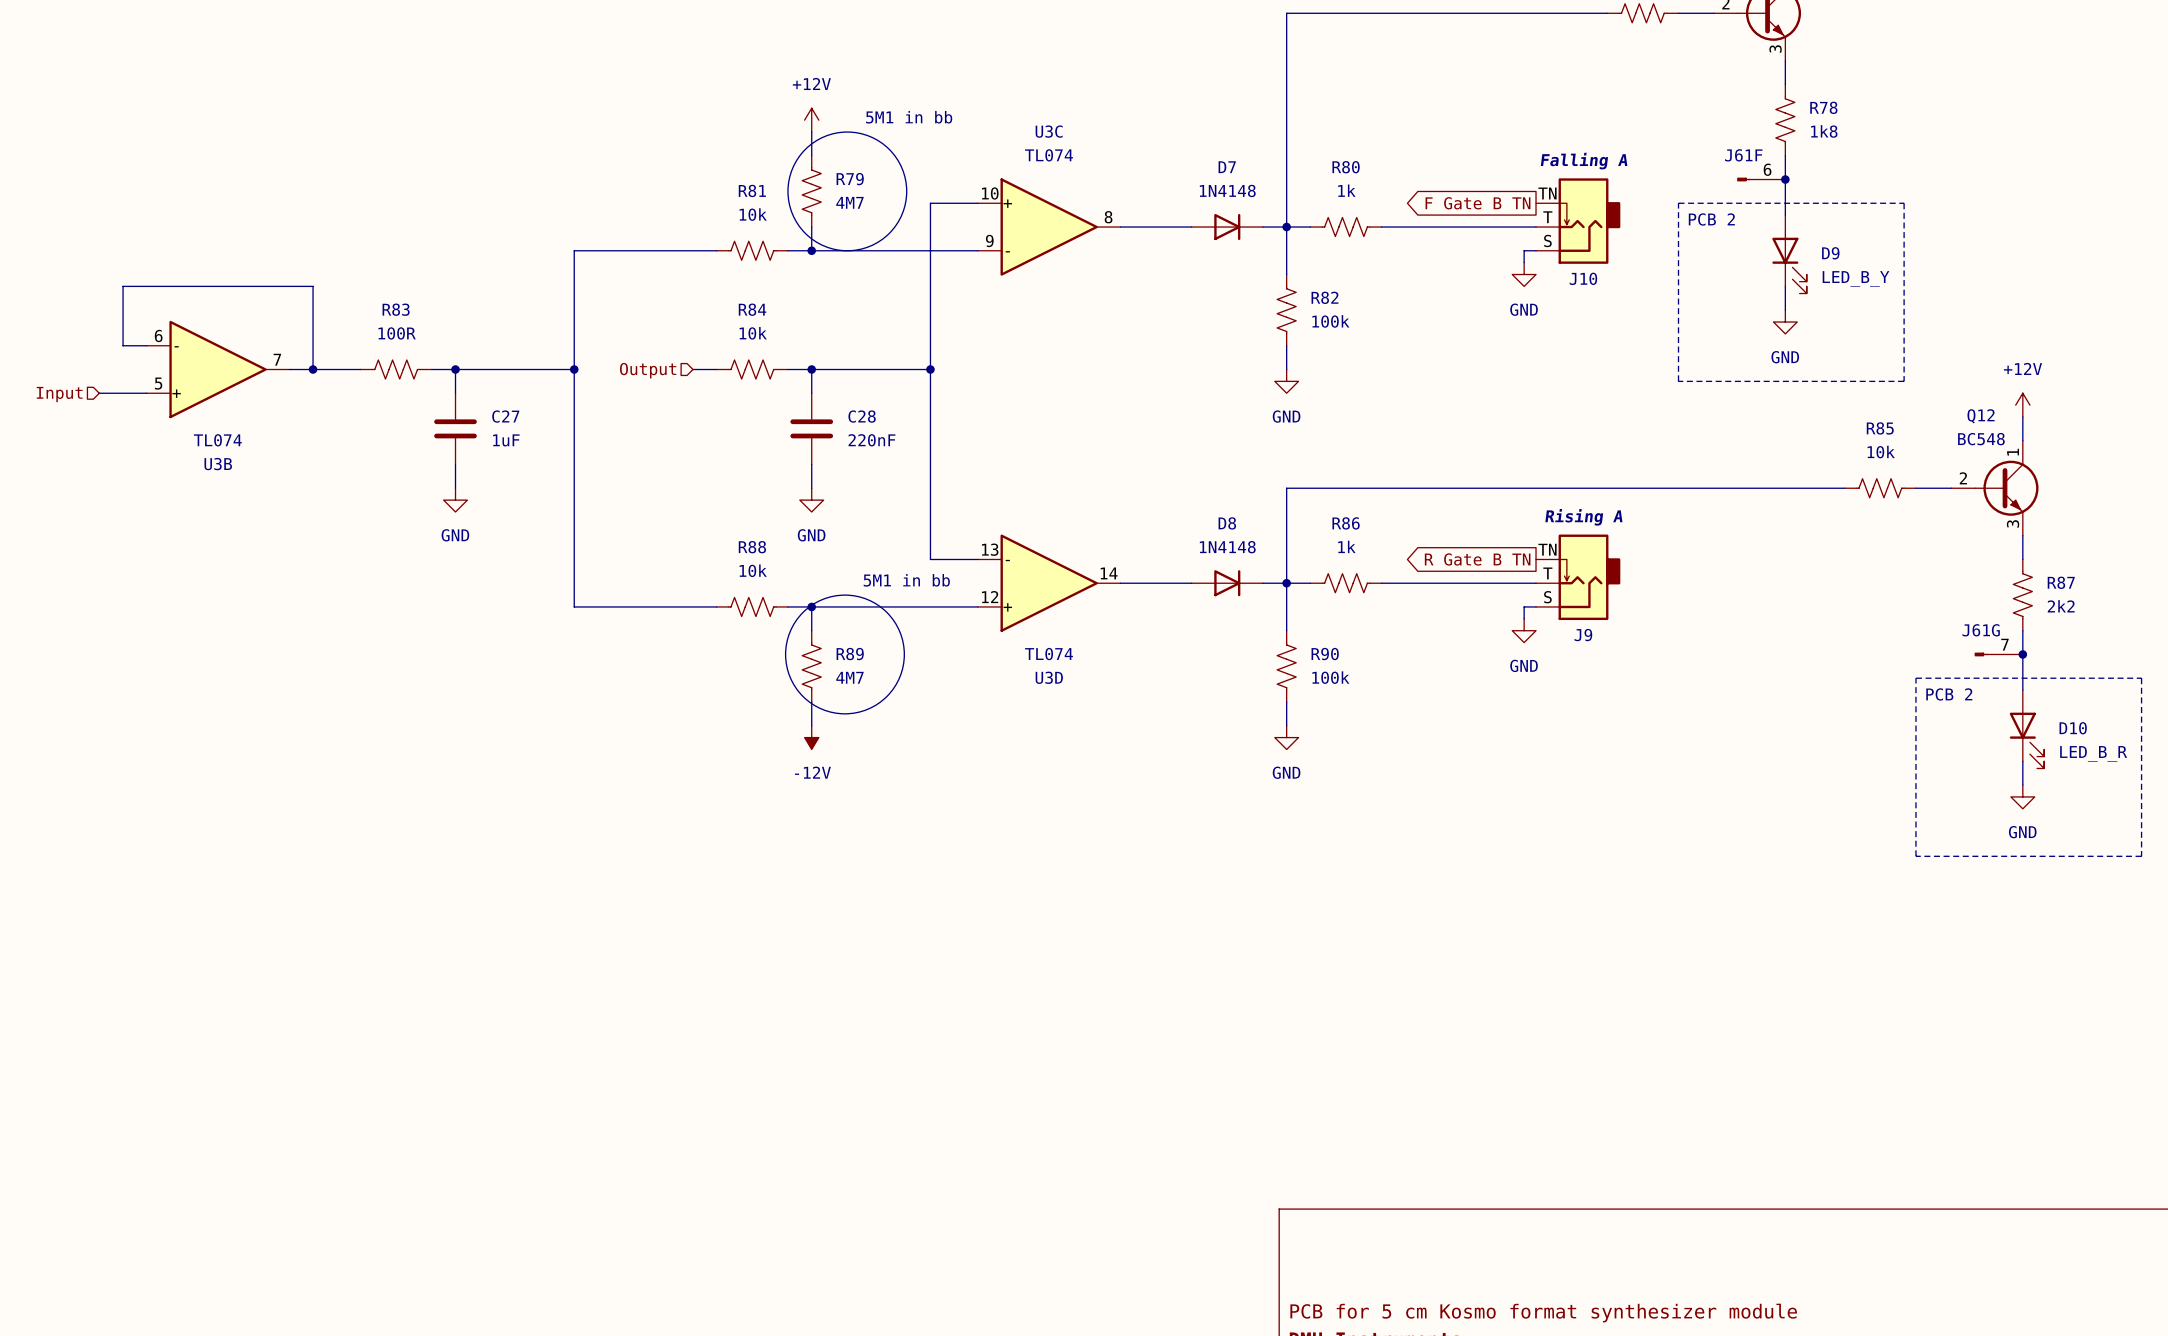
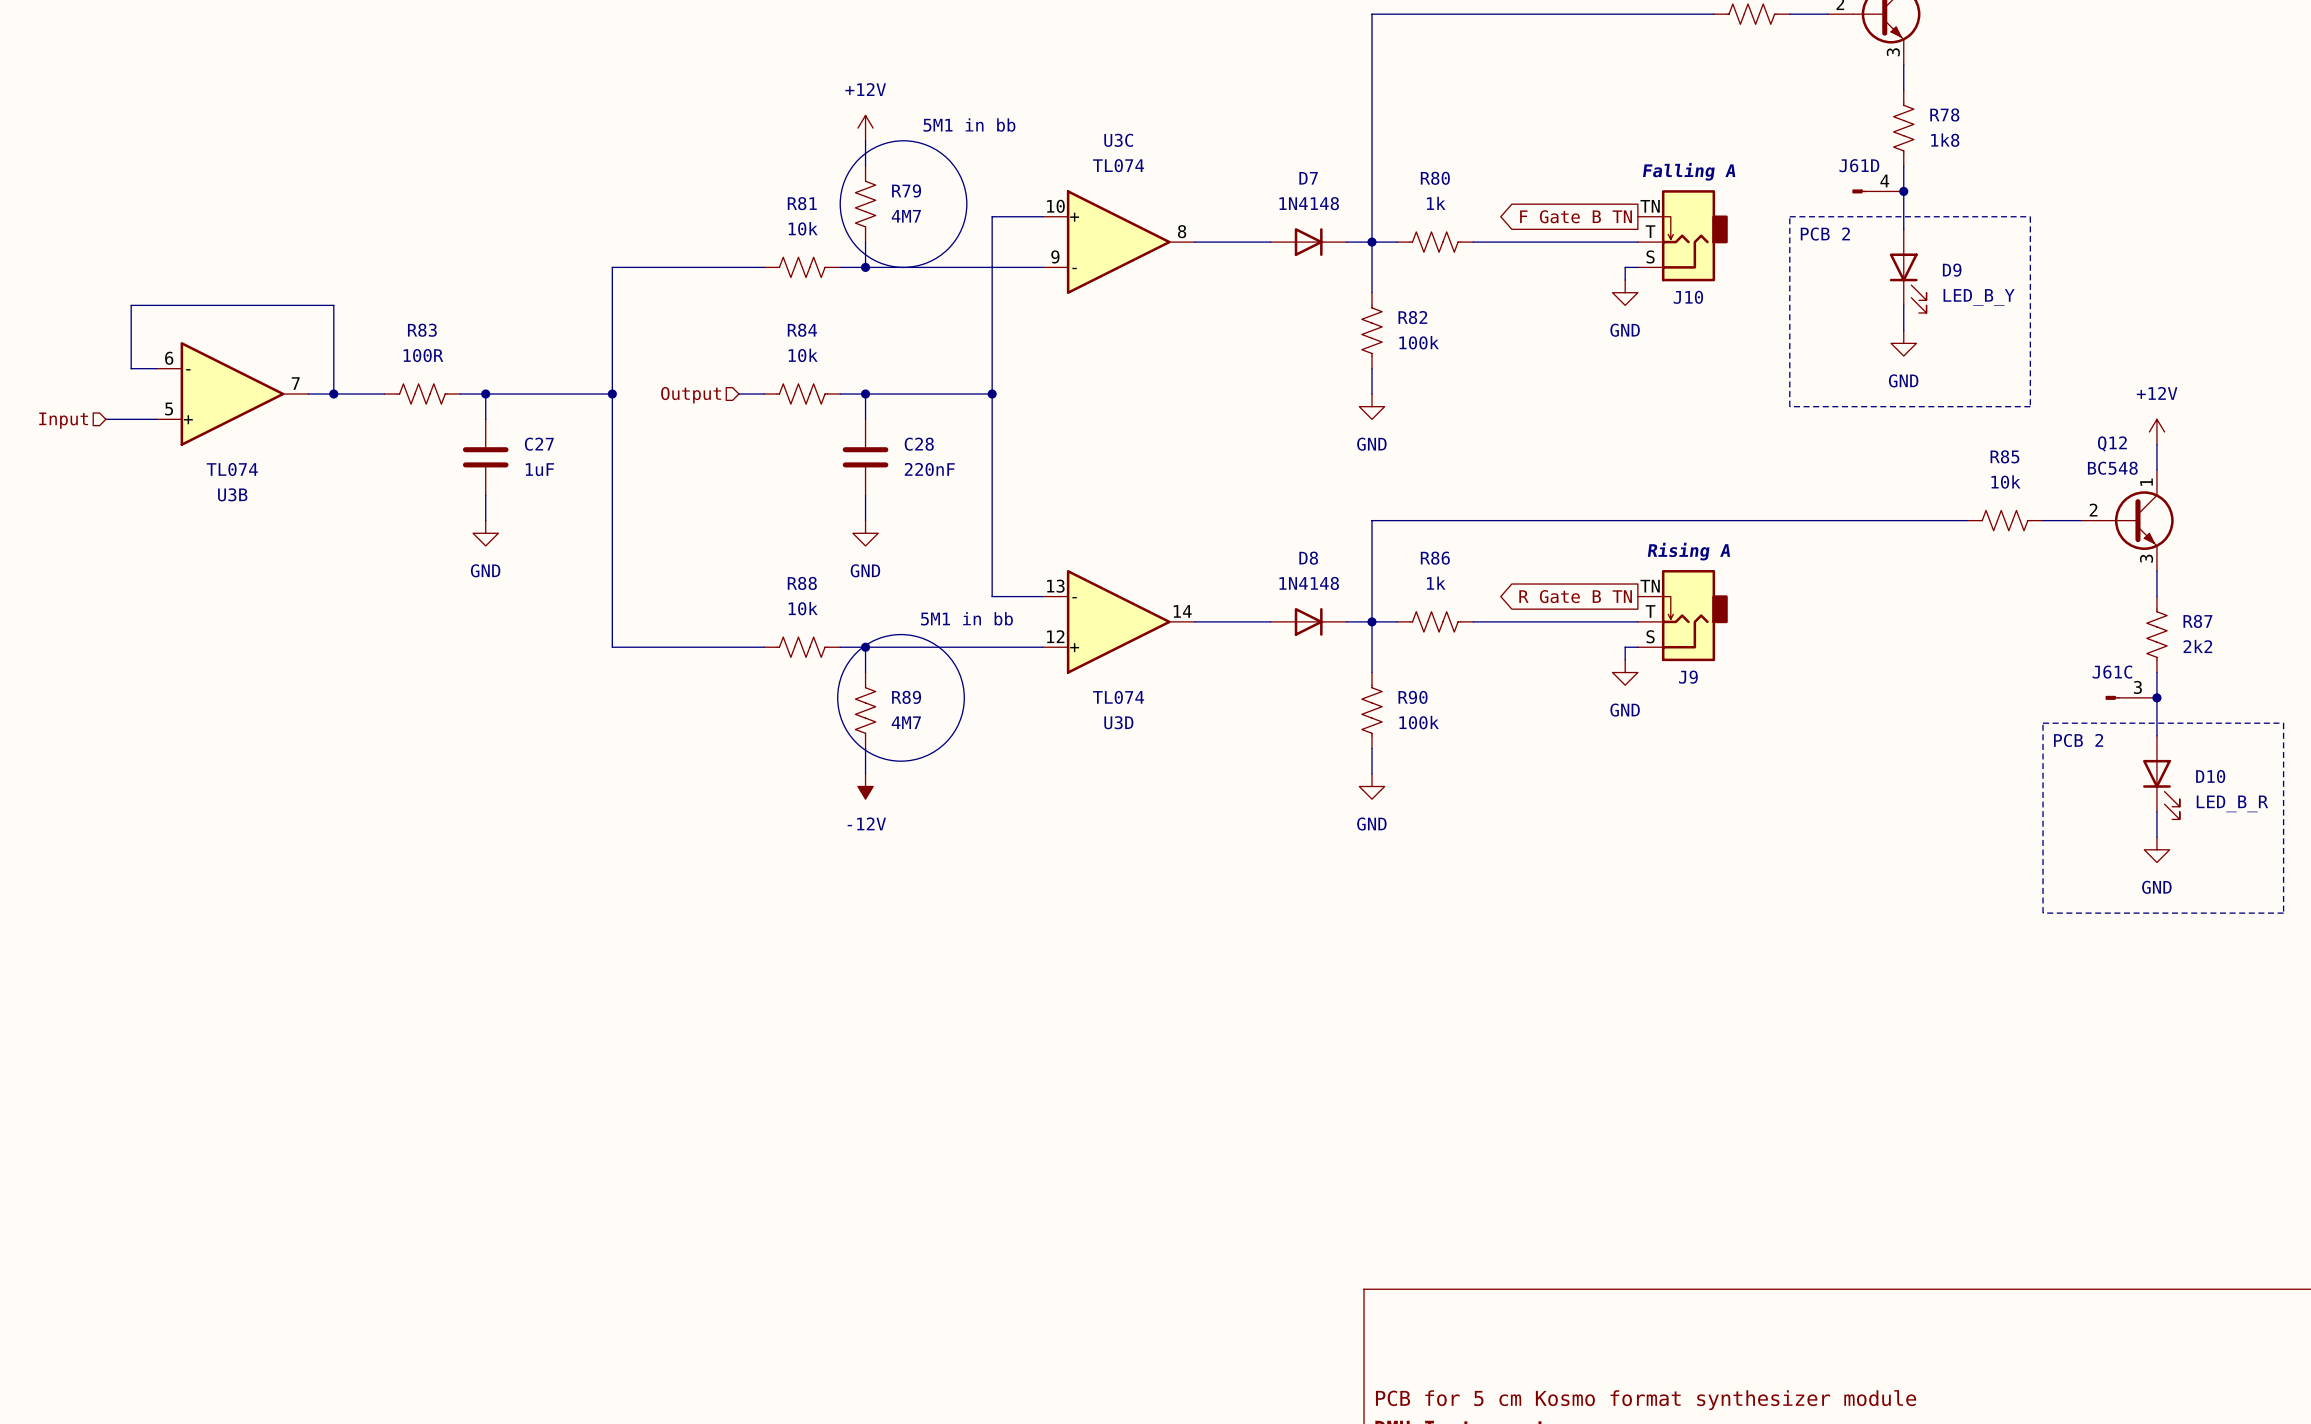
J61F name: J61F (1743, 155) -> J61D (1859, 165)
J61F pin number: 6 (1767, 169) -> 4 (1884, 180)
J61G name: J61G (1981, 630) -> J61C (2112, 672)
J61G pin number: 7 (2004, 644) -> 3 (2137, 687)

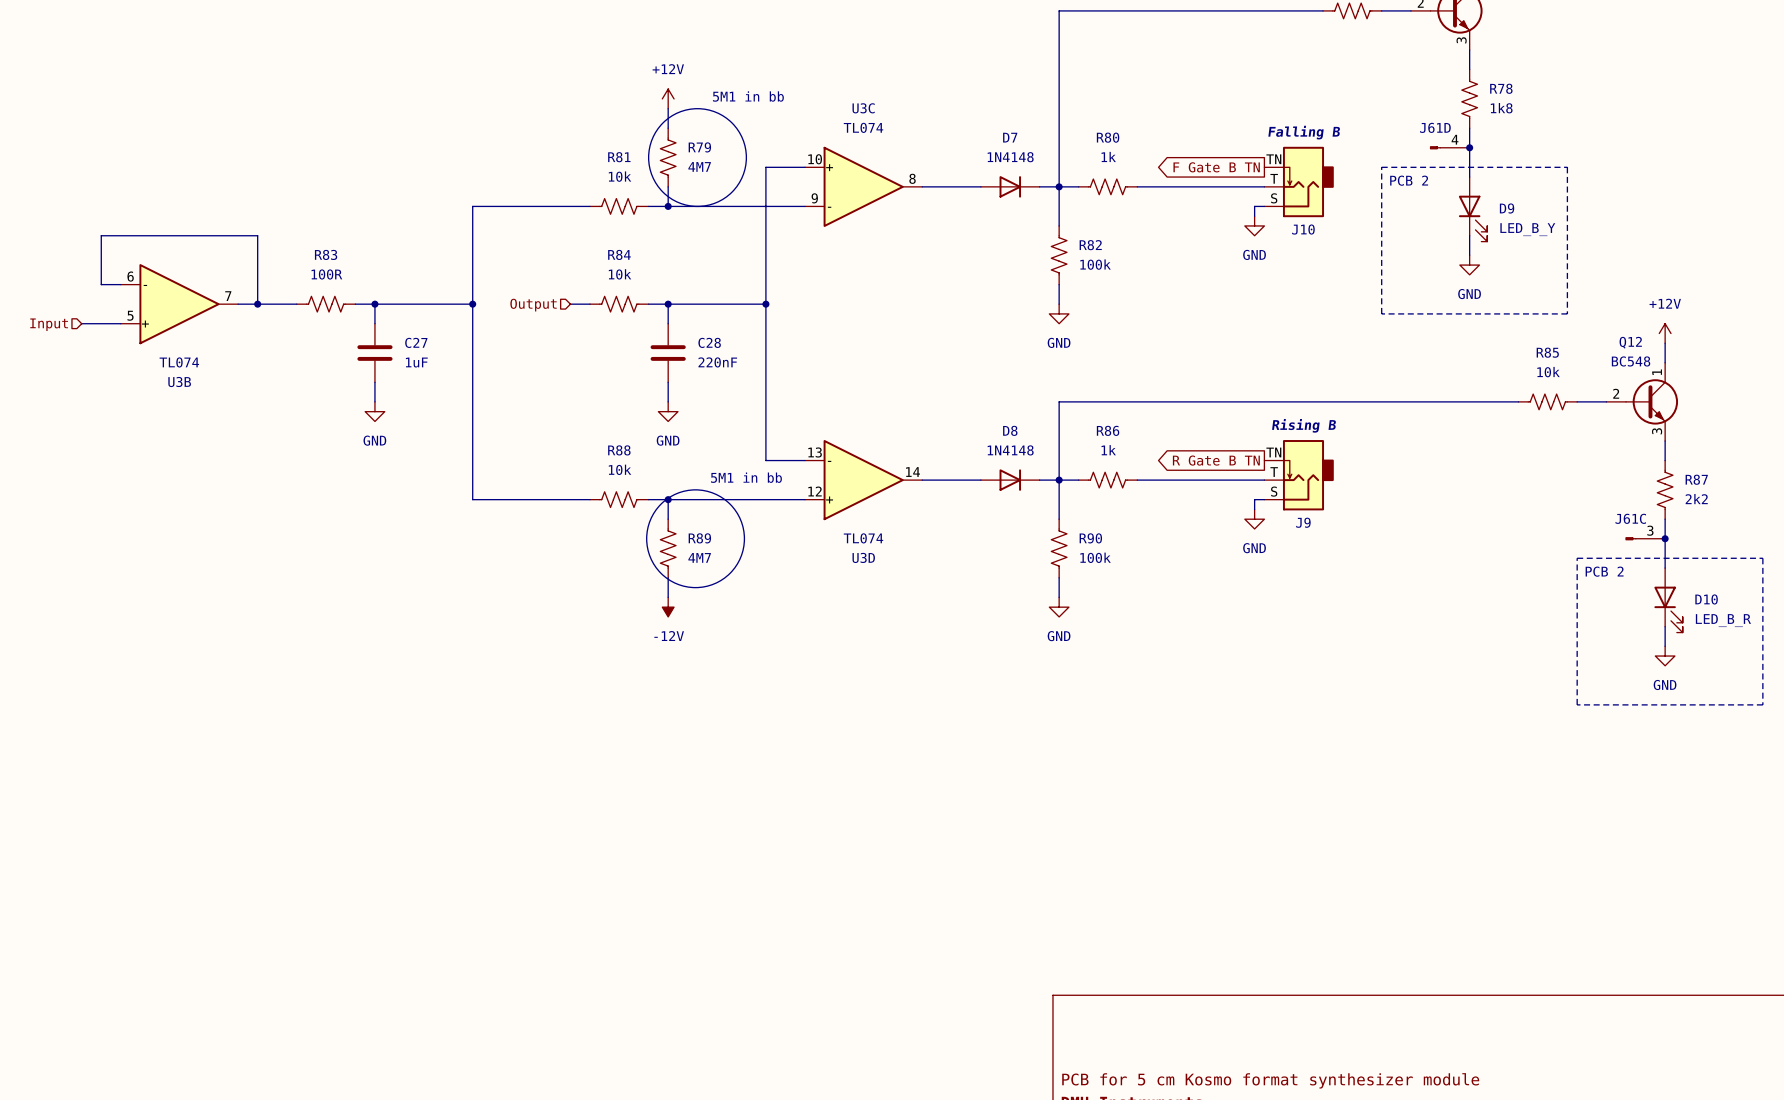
J10 text: Falling A (1689, 171) -> Falling B (1304, 132)
J9 text: Rising A (1688, 551) -> Rising B (1304, 425)

